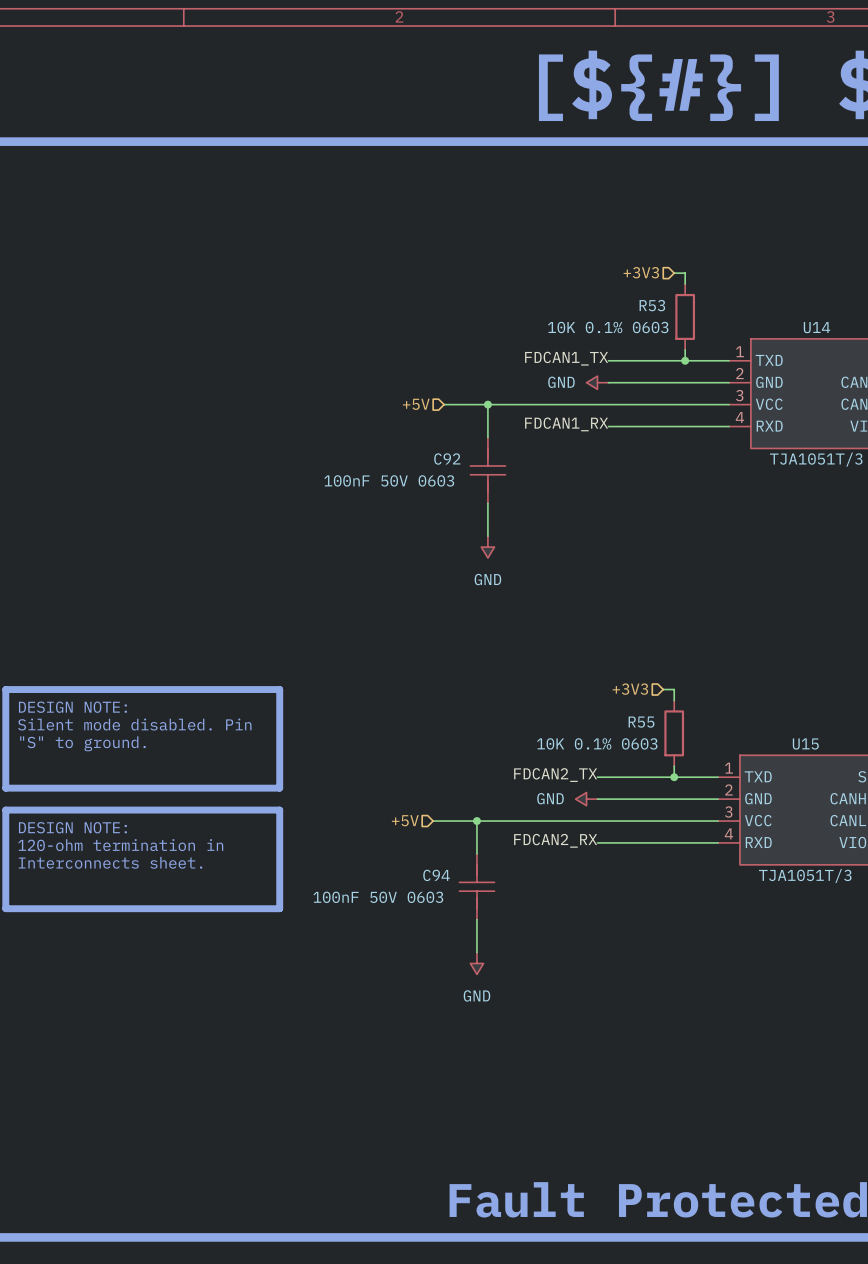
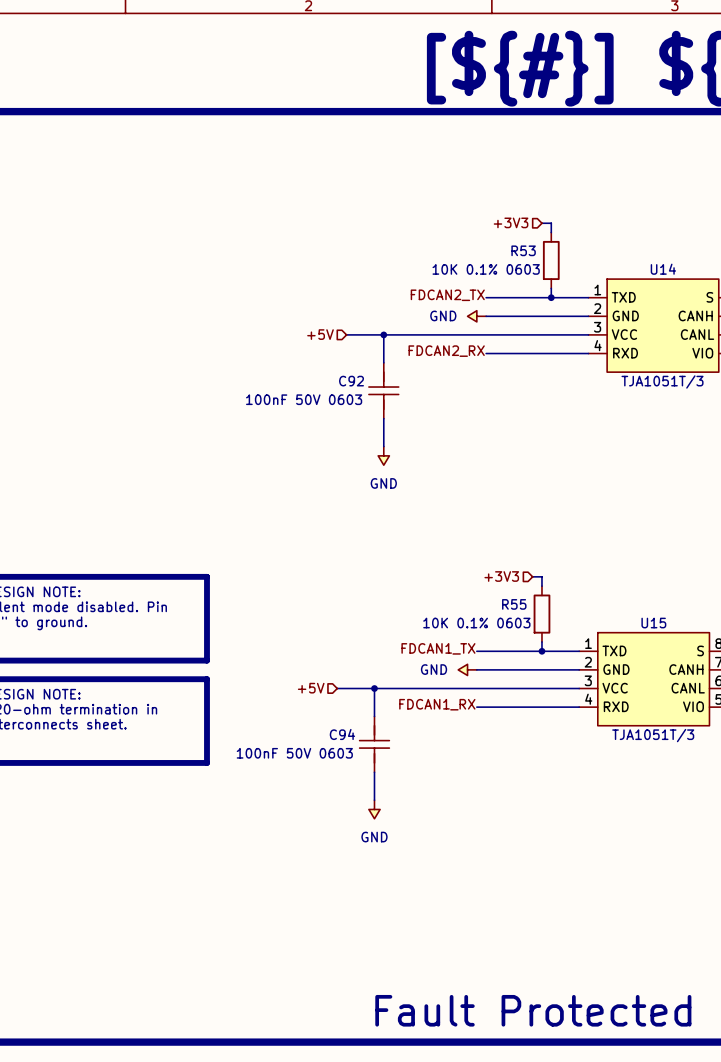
label: FDCAN1_TX (566, 358) -> FDCAN2_TX (447, 295)
label: FDCAN1_RX (566, 424) -> FDCAN2_RX (446, 351)
label: FDCAN2_TX (555, 775) -> FDCAN1_TX (438, 648)
label: FDCAN2_RX (555, 840) -> FDCAN1_RX (437, 704)

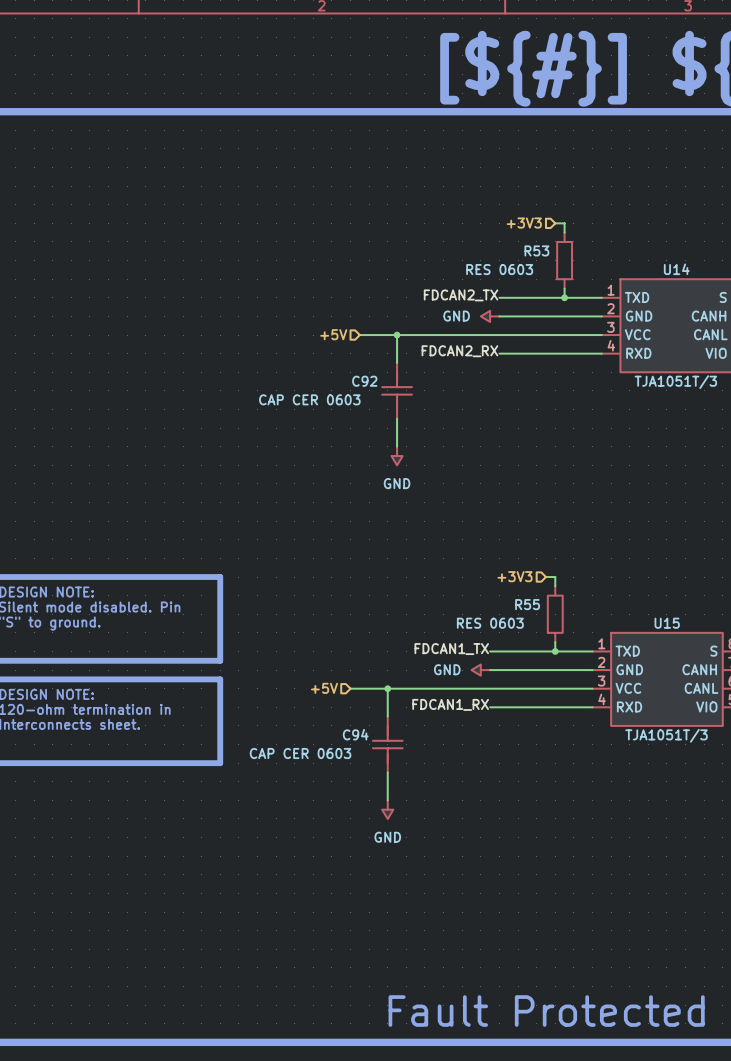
R53 value: 10K 0.1% 0603 (486, 269) -> RES 0603 (499, 269)
C92 value: 100nF 50V 0603 (304, 399) -> CAP CER 0603 (309, 399)
R55 value: 10K 0.1% 0603 (476, 623) -> RES 0603 (490, 623)
C94 value: 100nF 50V 0603 (294, 753) -> CAP CER 0603 (300, 753)

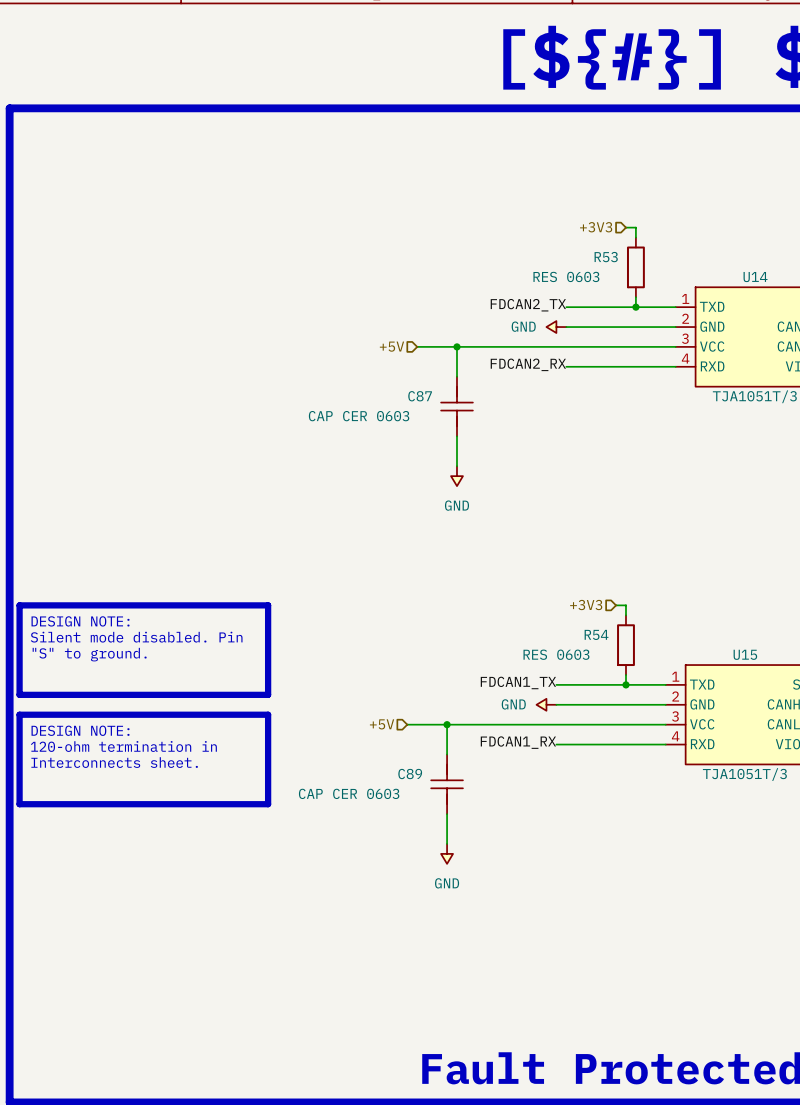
C92 name: C92 (364, 381) -> C87 (420, 396)
R55 name: R55 (527, 604) -> R54 (596, 634)
C94 name: C94 (355, 734) -> C89 (410, 774)

